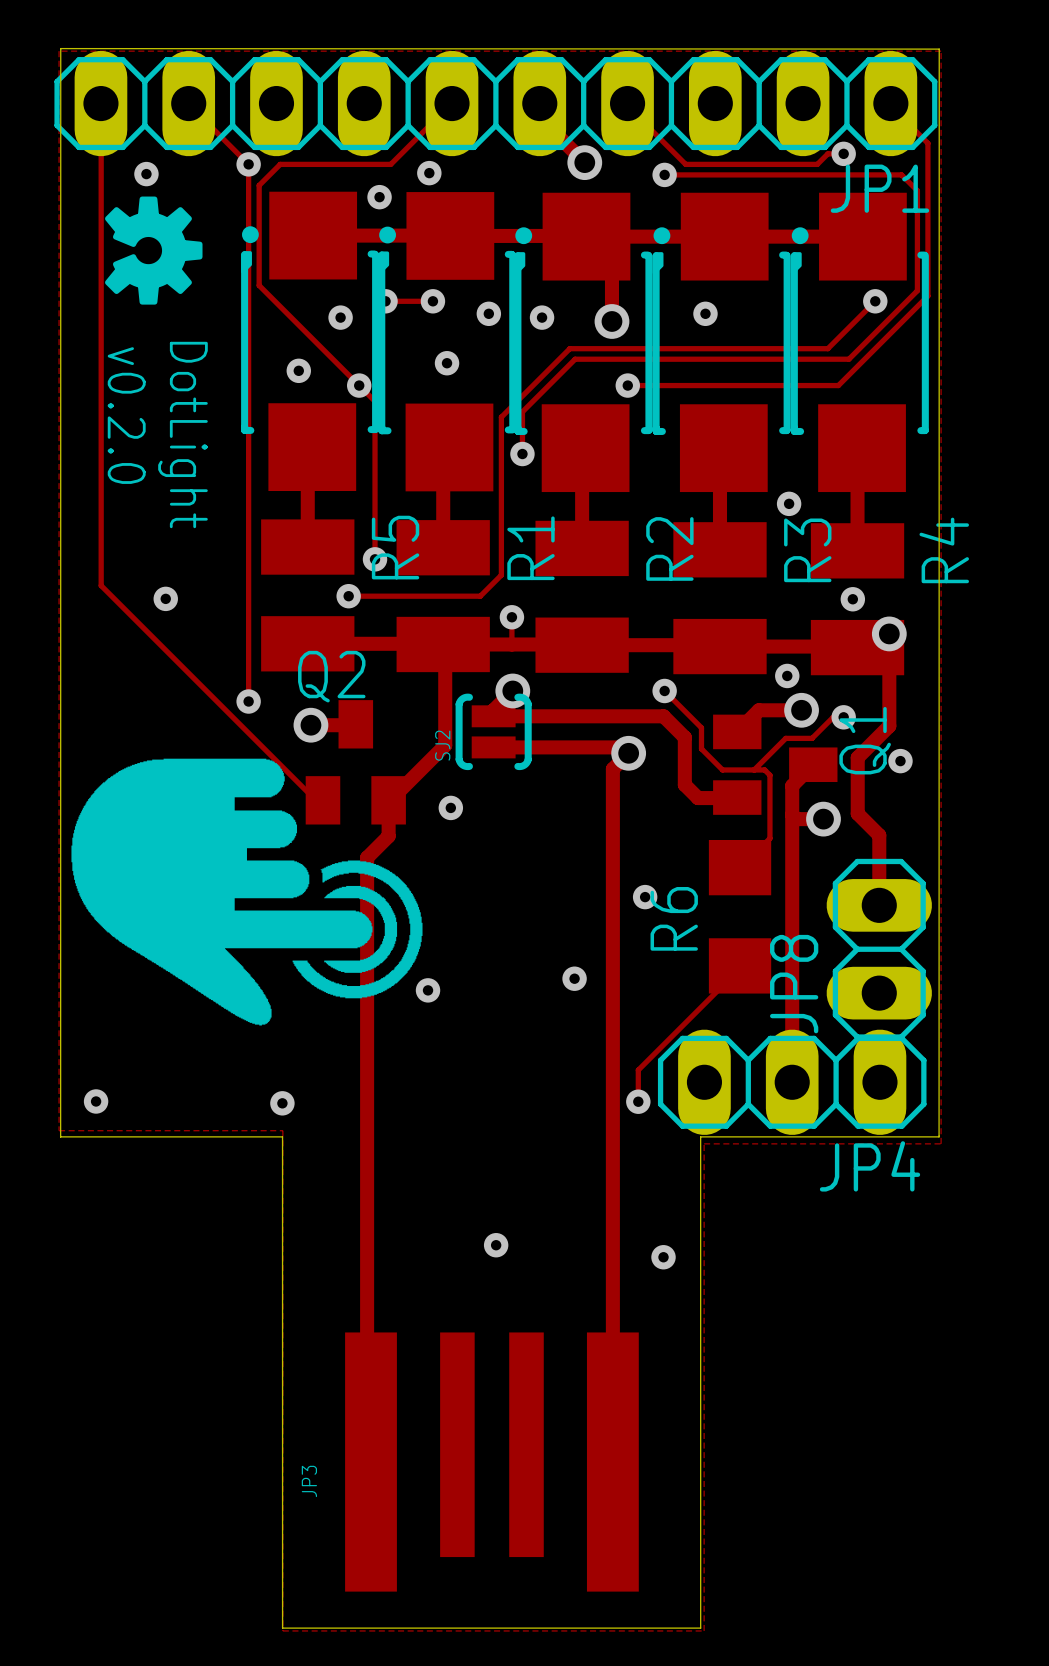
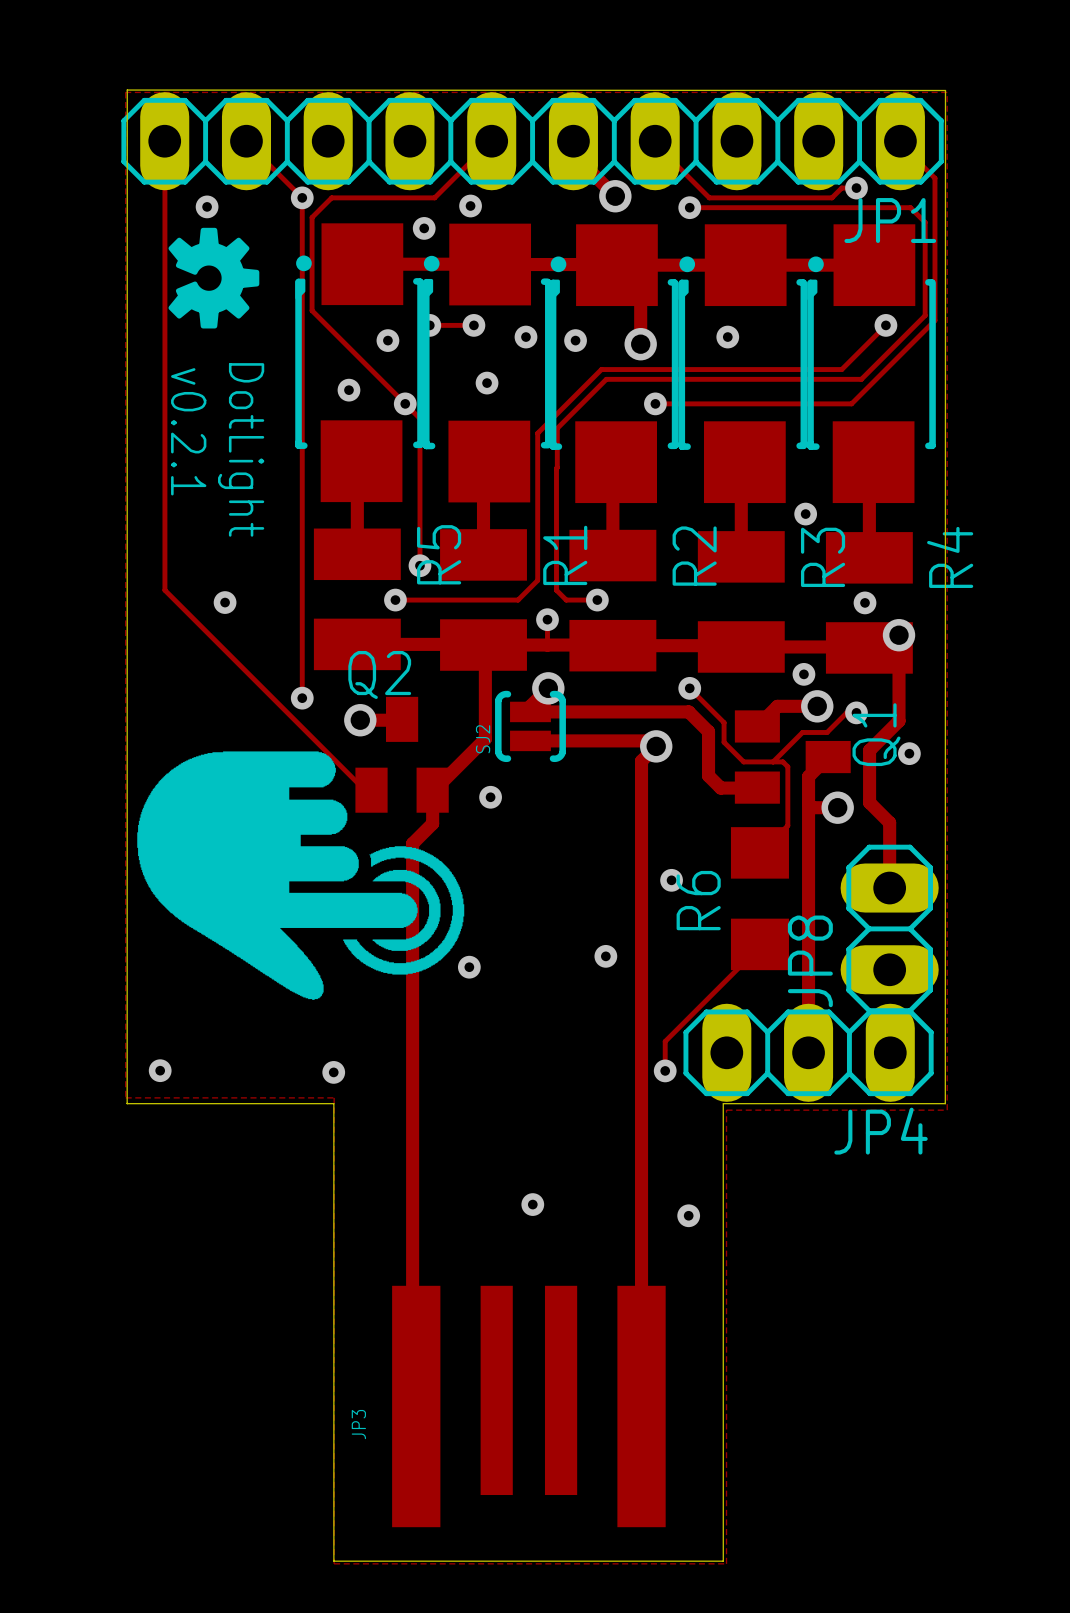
text: v0.2.0 (126, 415) -> v0.2.1 (188, 431)
track: none -> (557, 467) (556, 590) (566, 600) (597, 600)
via position: (522, 454) -> (597, 600)

